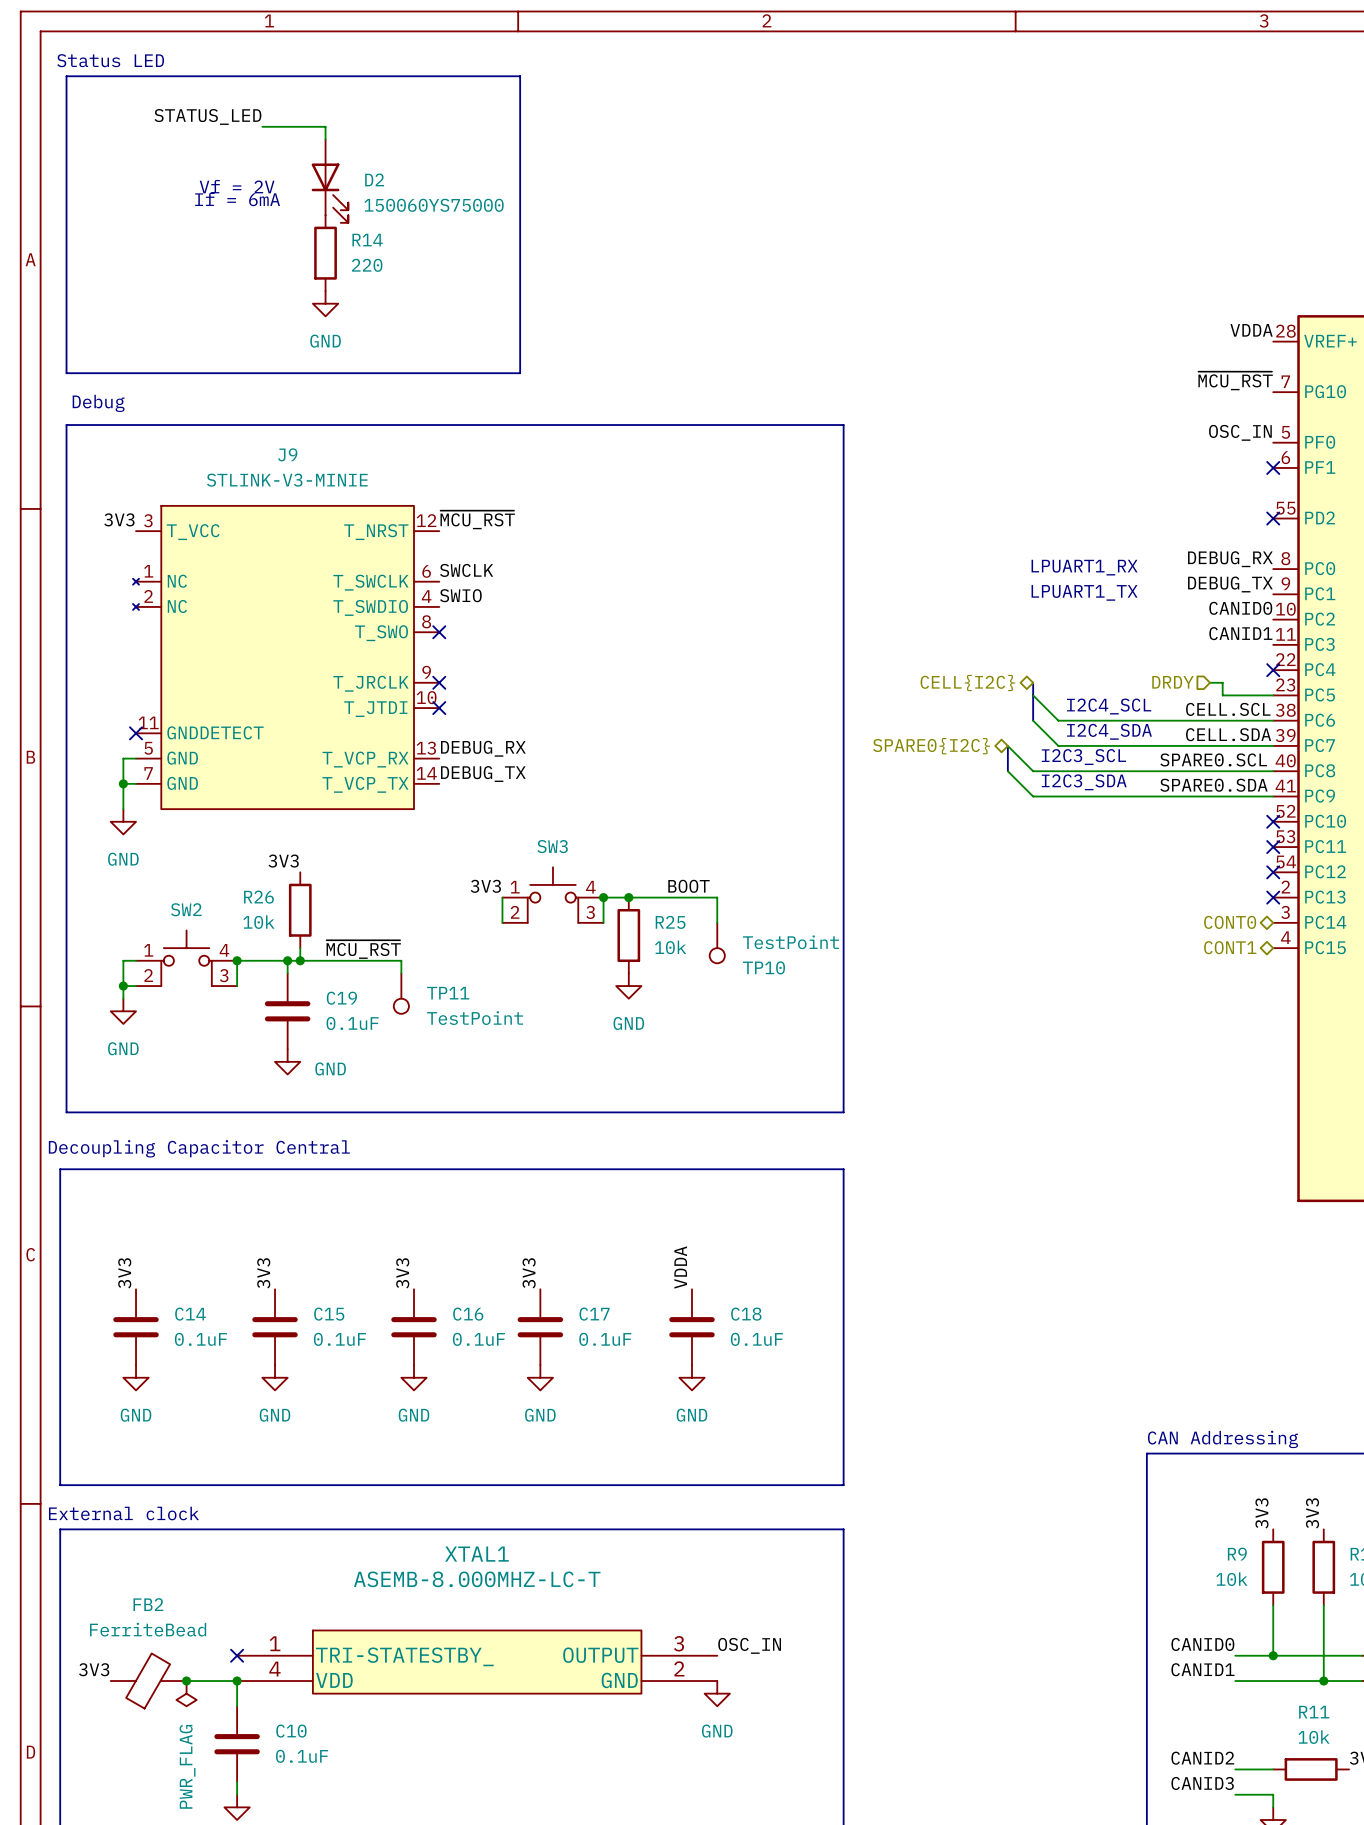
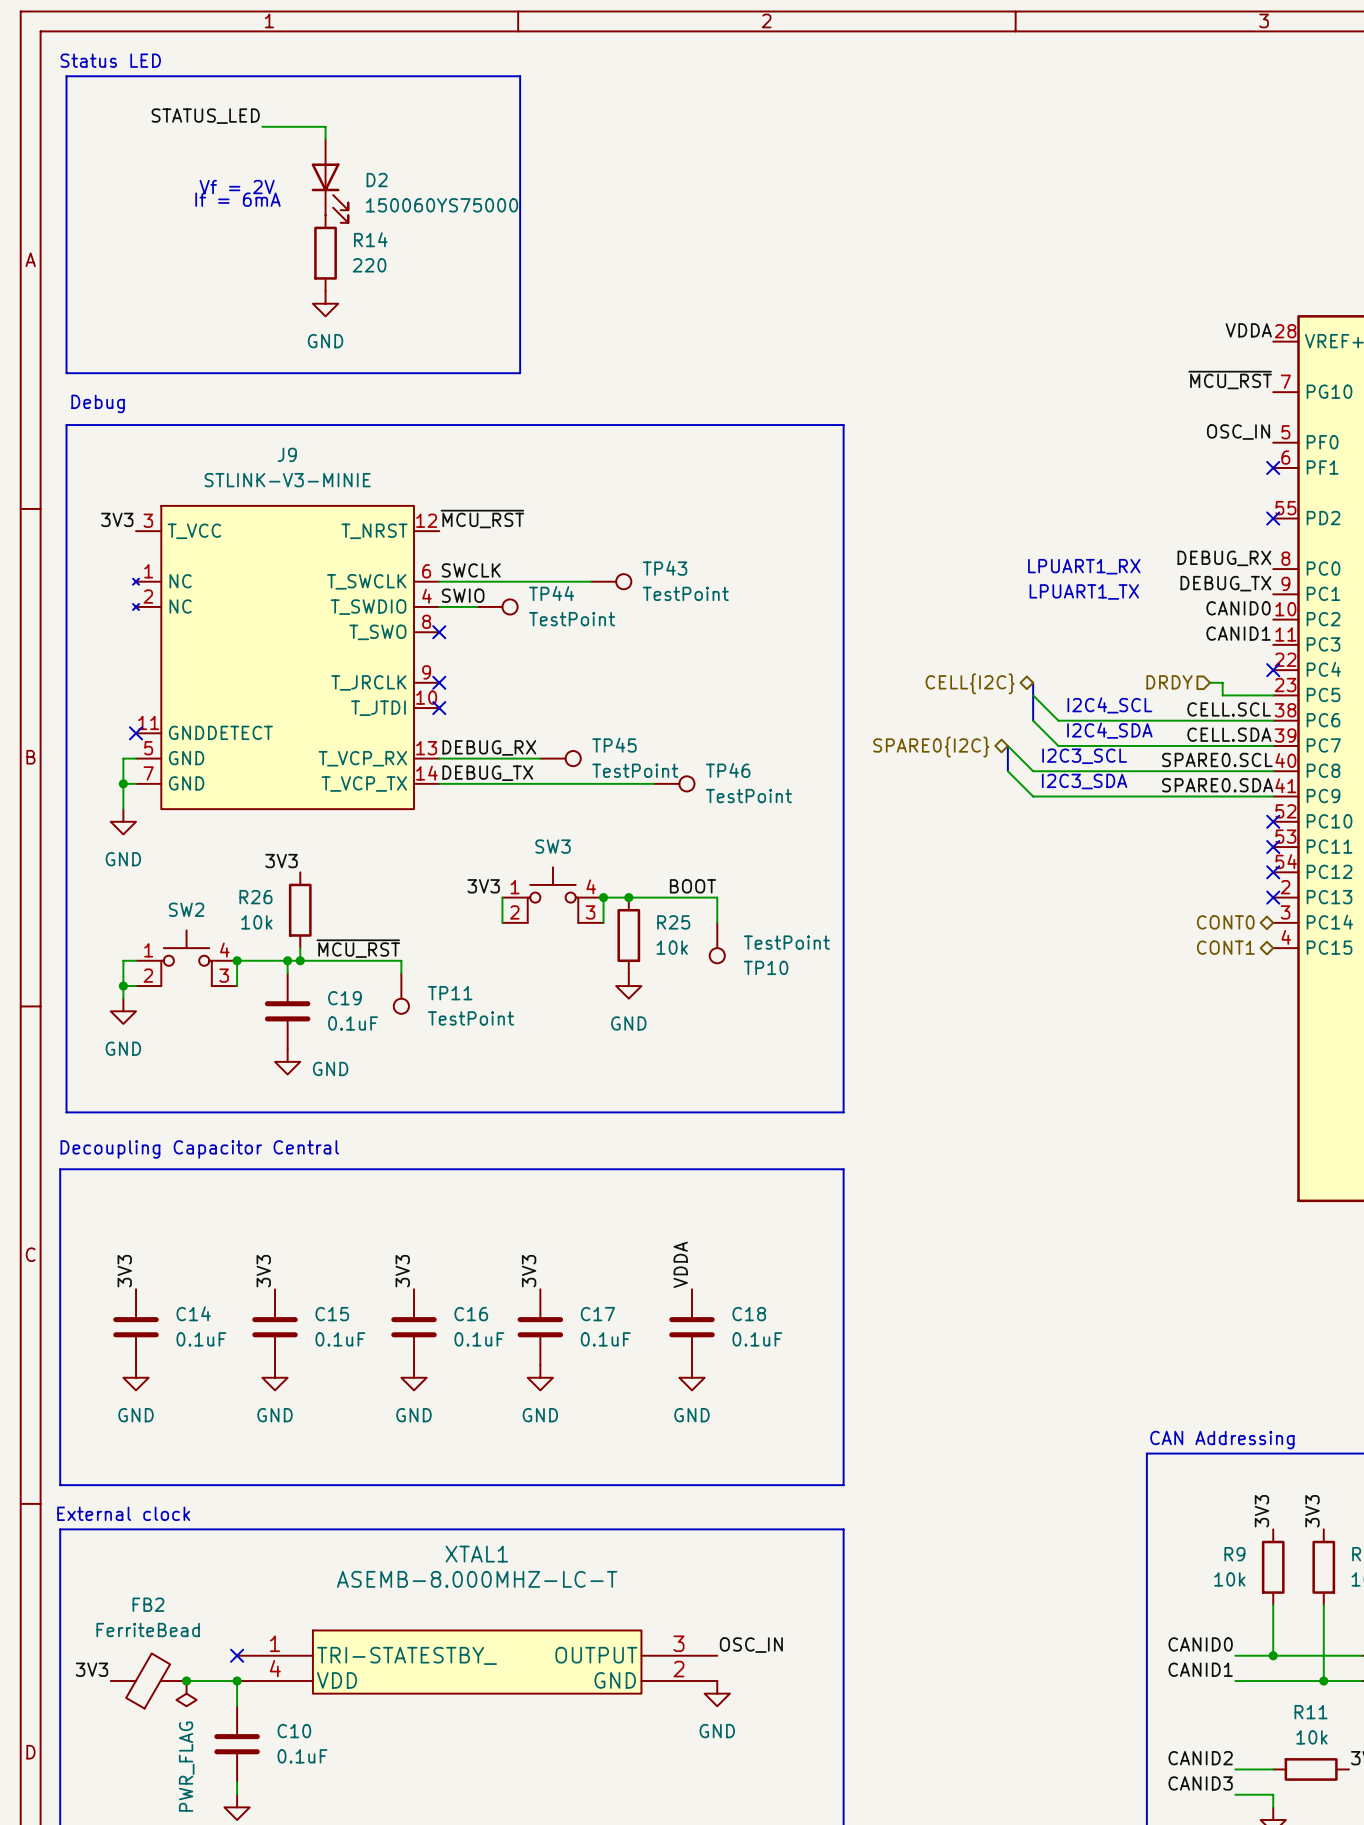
wire: none -> (439, 581) (590, 581)
TP43: none -> TestPoint (611, 581)
wire: none -> (439, 606) (477, 606)
TP44: none -> TestPoint (497, 606)
wire: none -> (439, 758) (540, 758)
TP45: none -> TestPoint (560, 758)
wire: none -> (439, 783) (654, 783)
TP46: none -> TestPoint (674, 783)

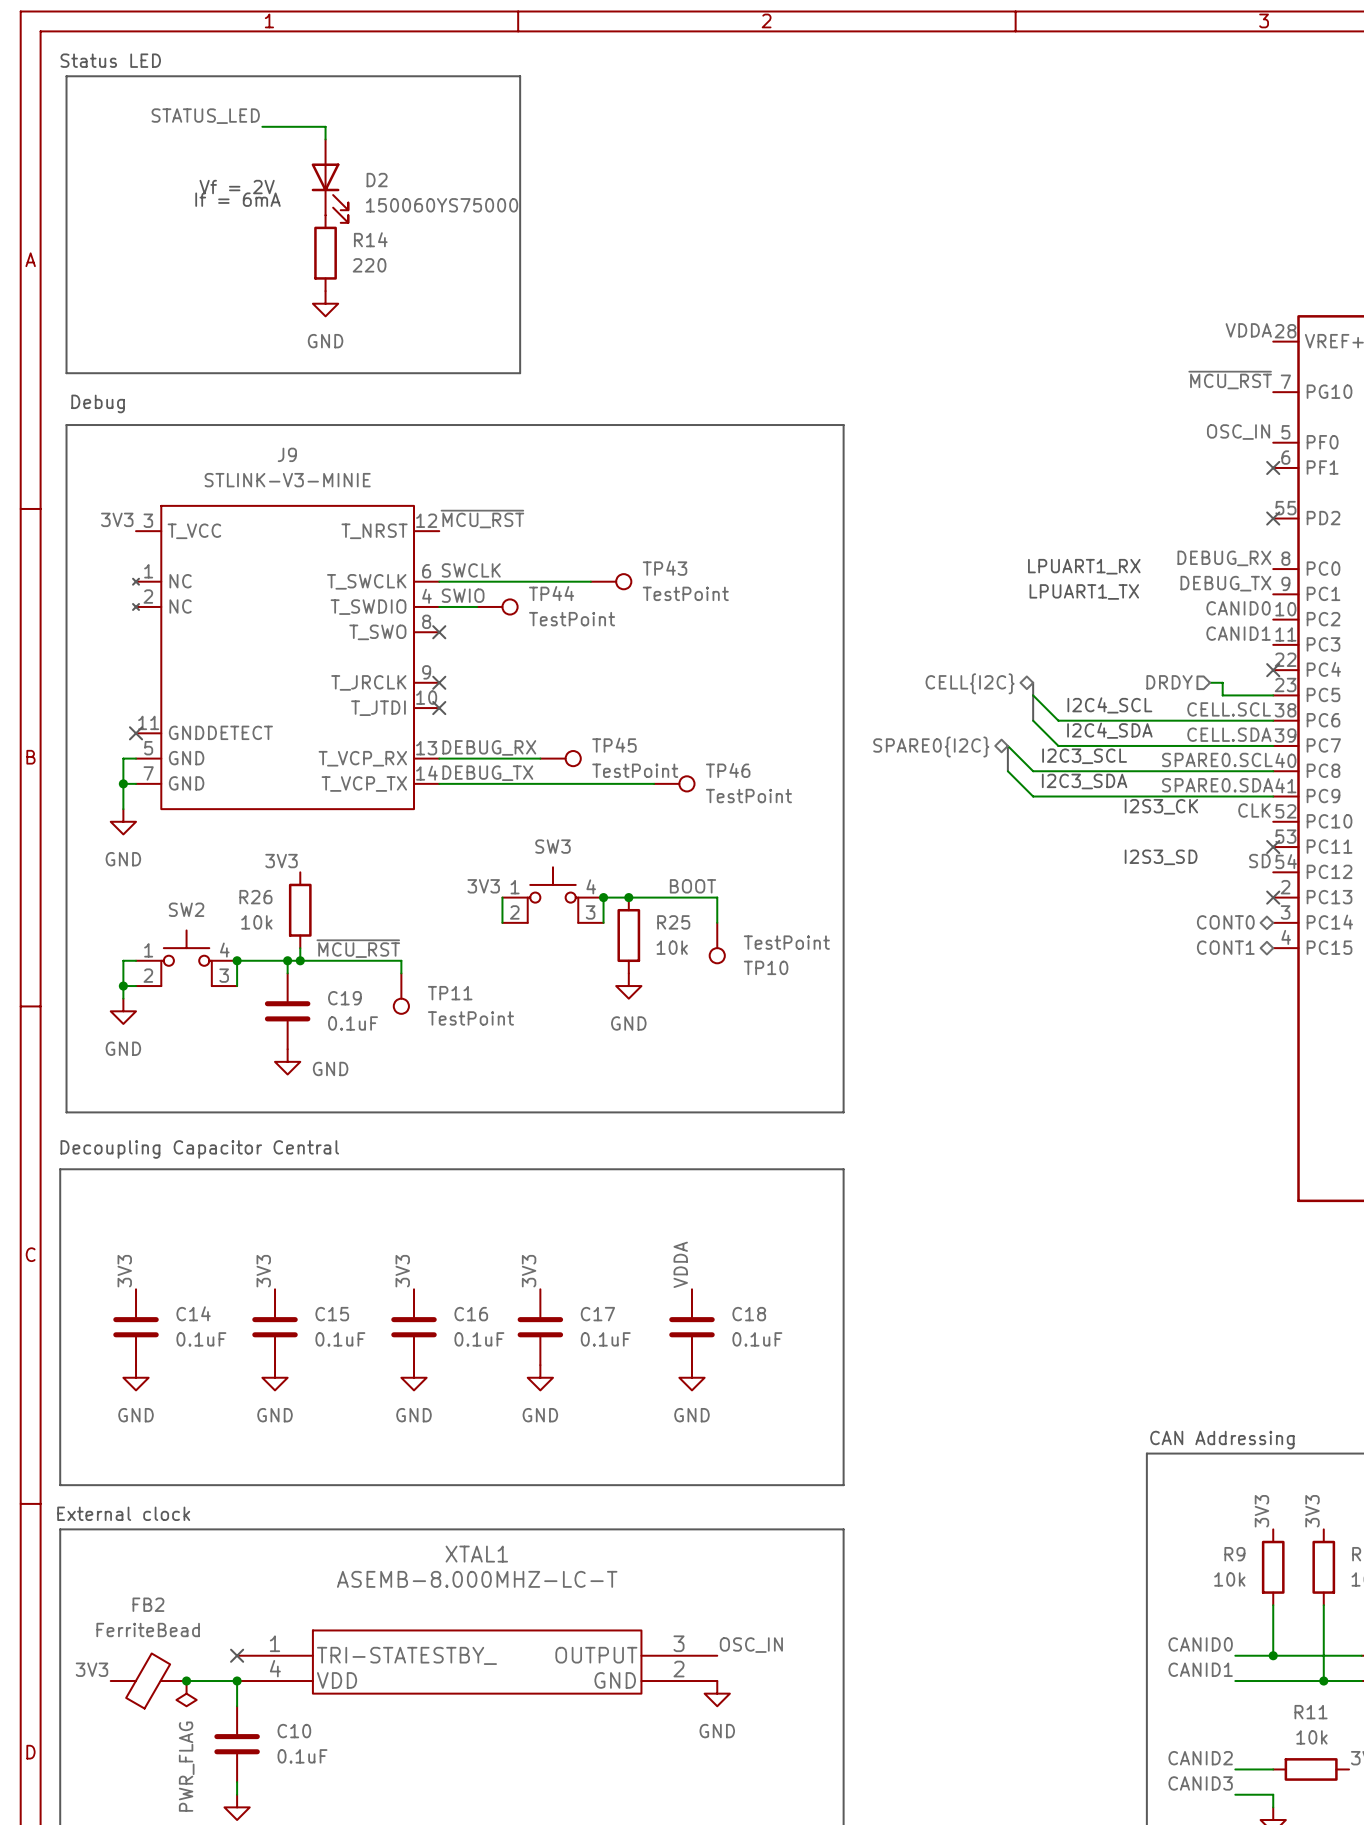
text: none -> I2S3_CK (1161, 806)
label: none -> CLK (1254, 810)
no-connect mark: (1273, 821) -> none
text: none -> I2S3_SD (1161, 857)
label: none -> SD (1259, 861)
no-connect mark: (1273, 872) -> none

